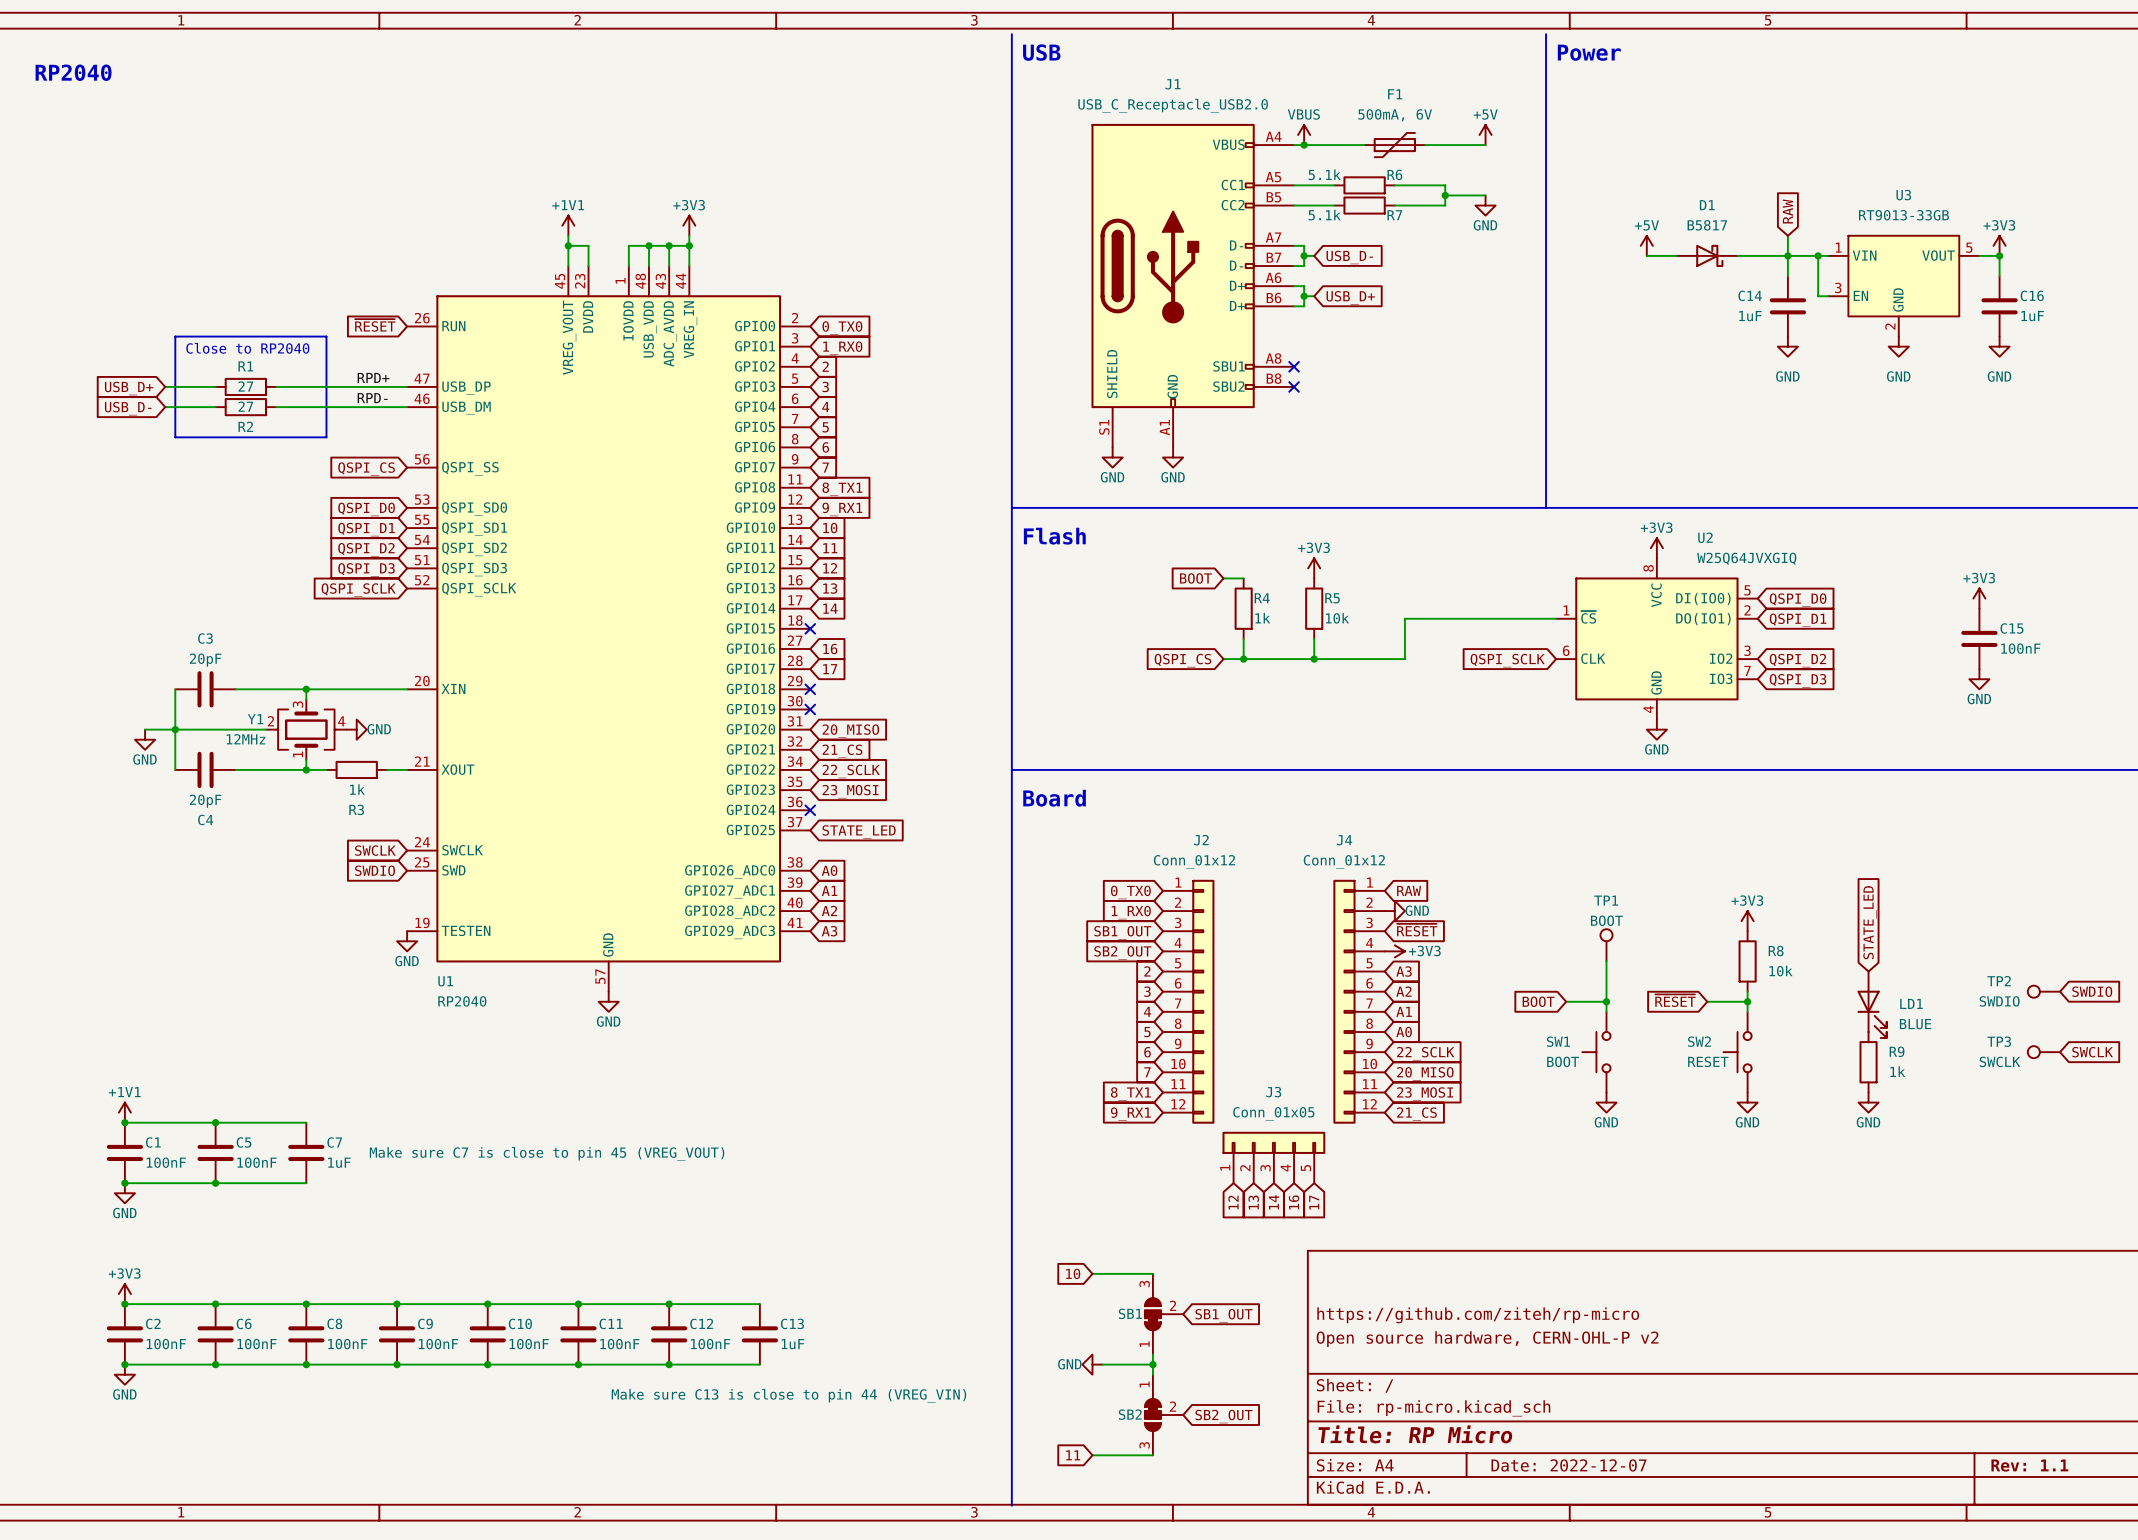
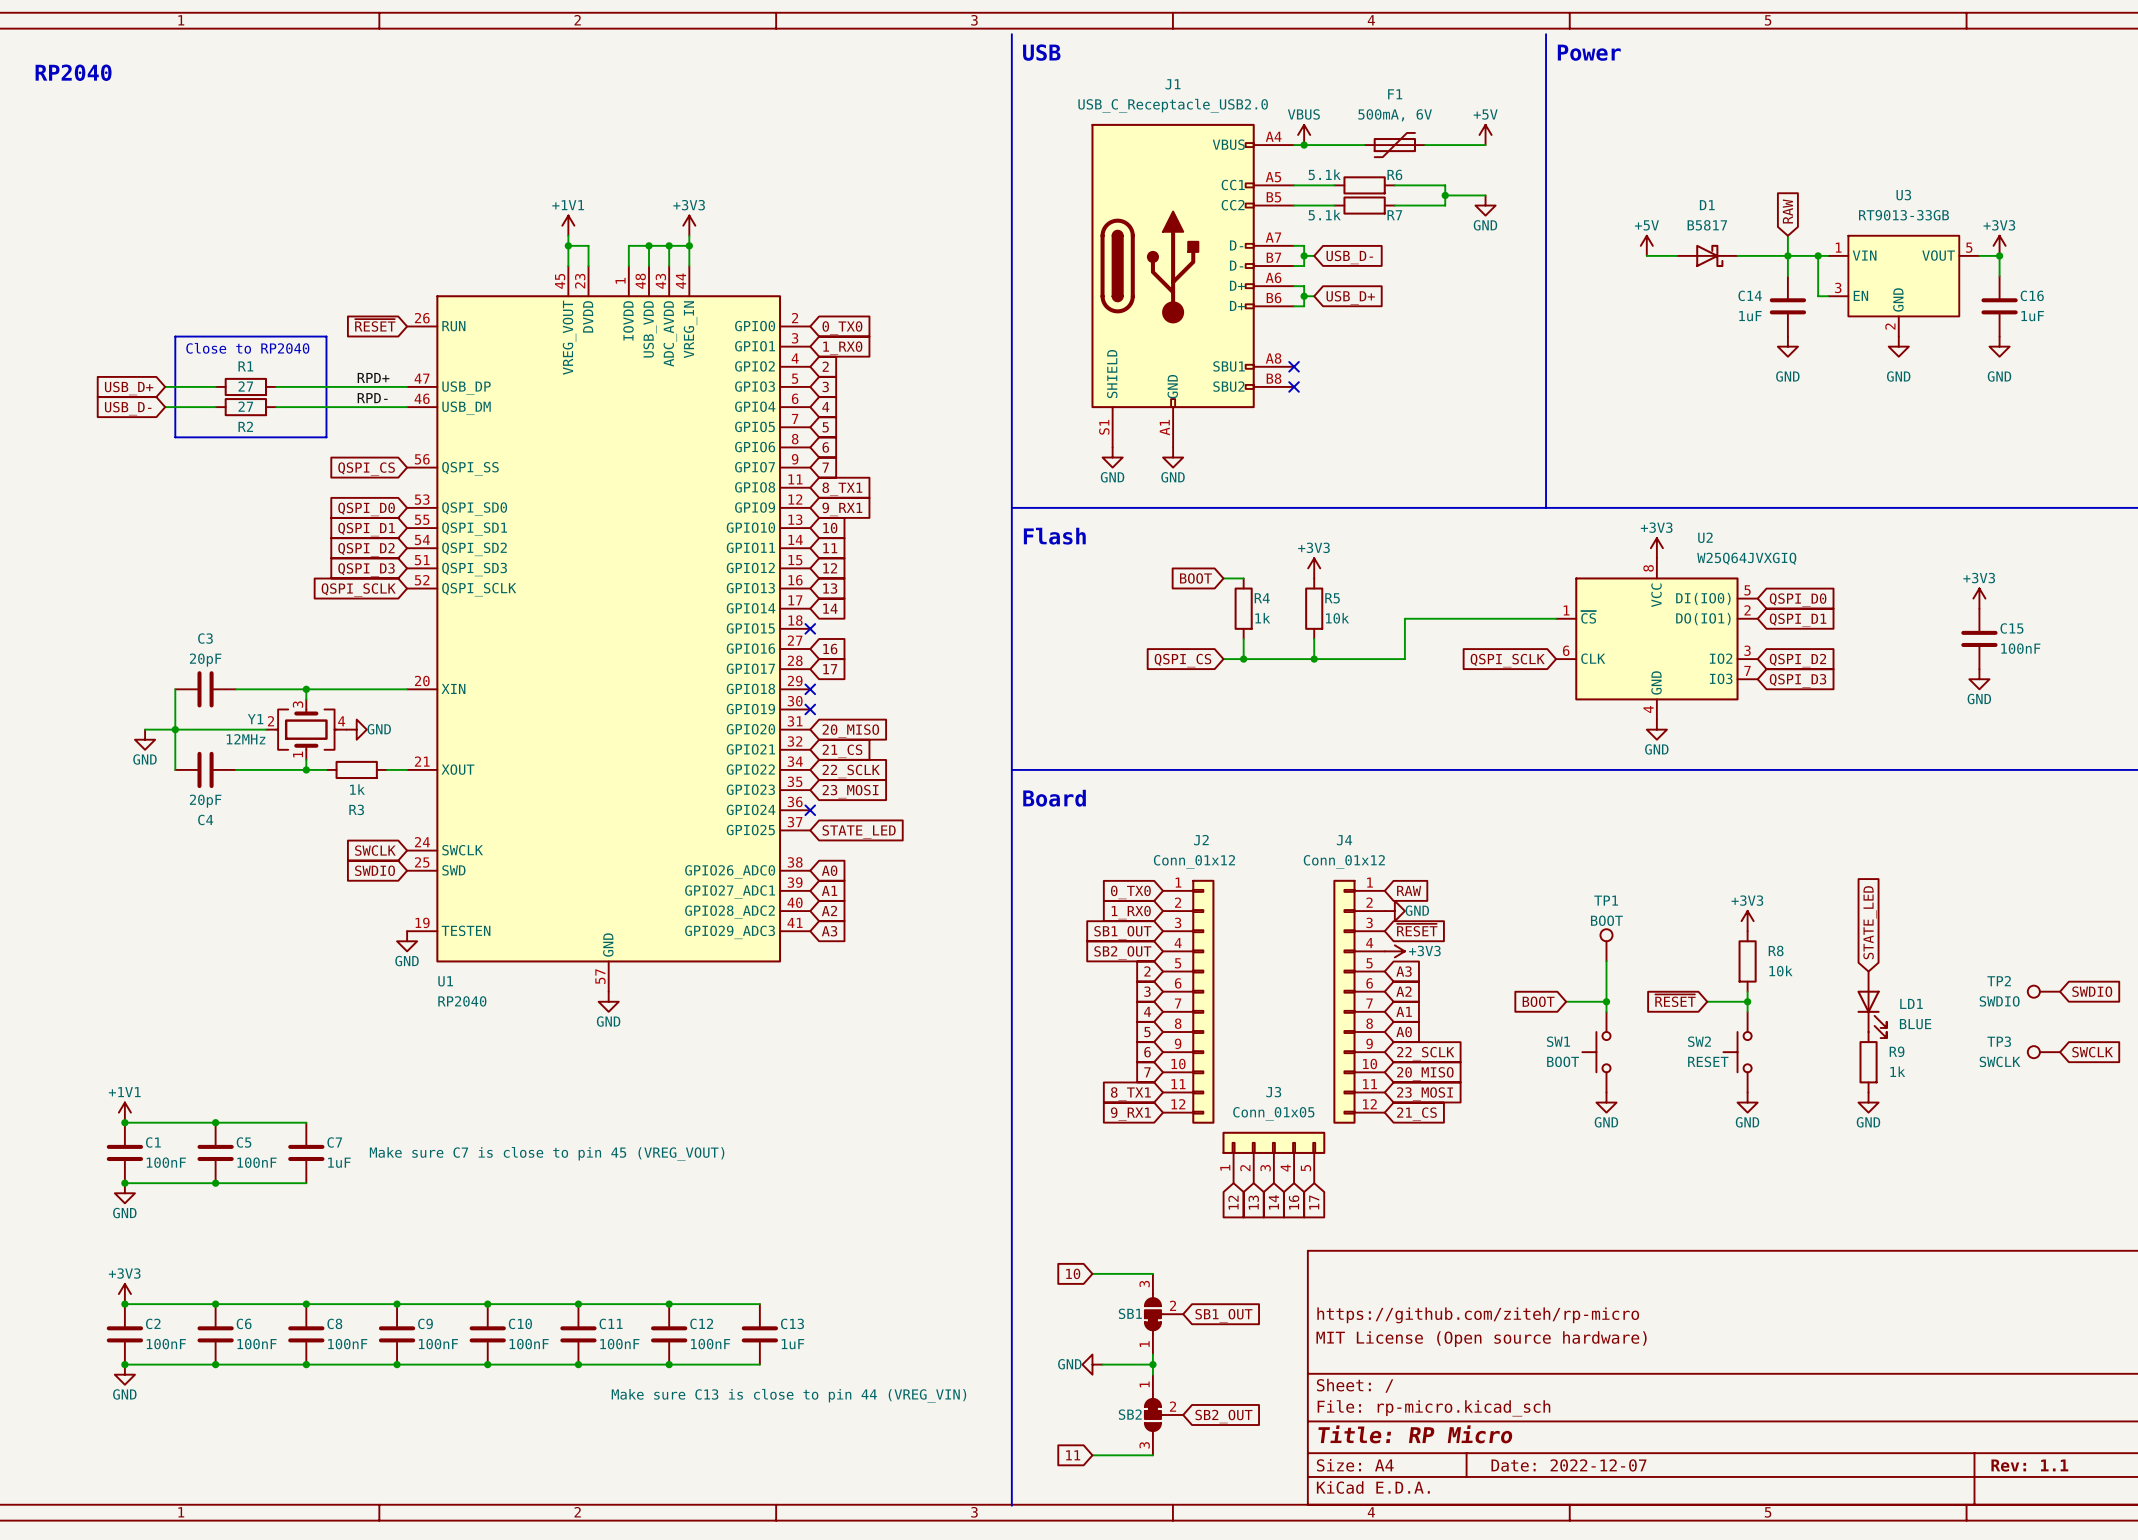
title block: Open source hardware, CERN-OHL-P v2 (1487, 1339) -> MIT License (Open source hardware) (1481, 1339)

